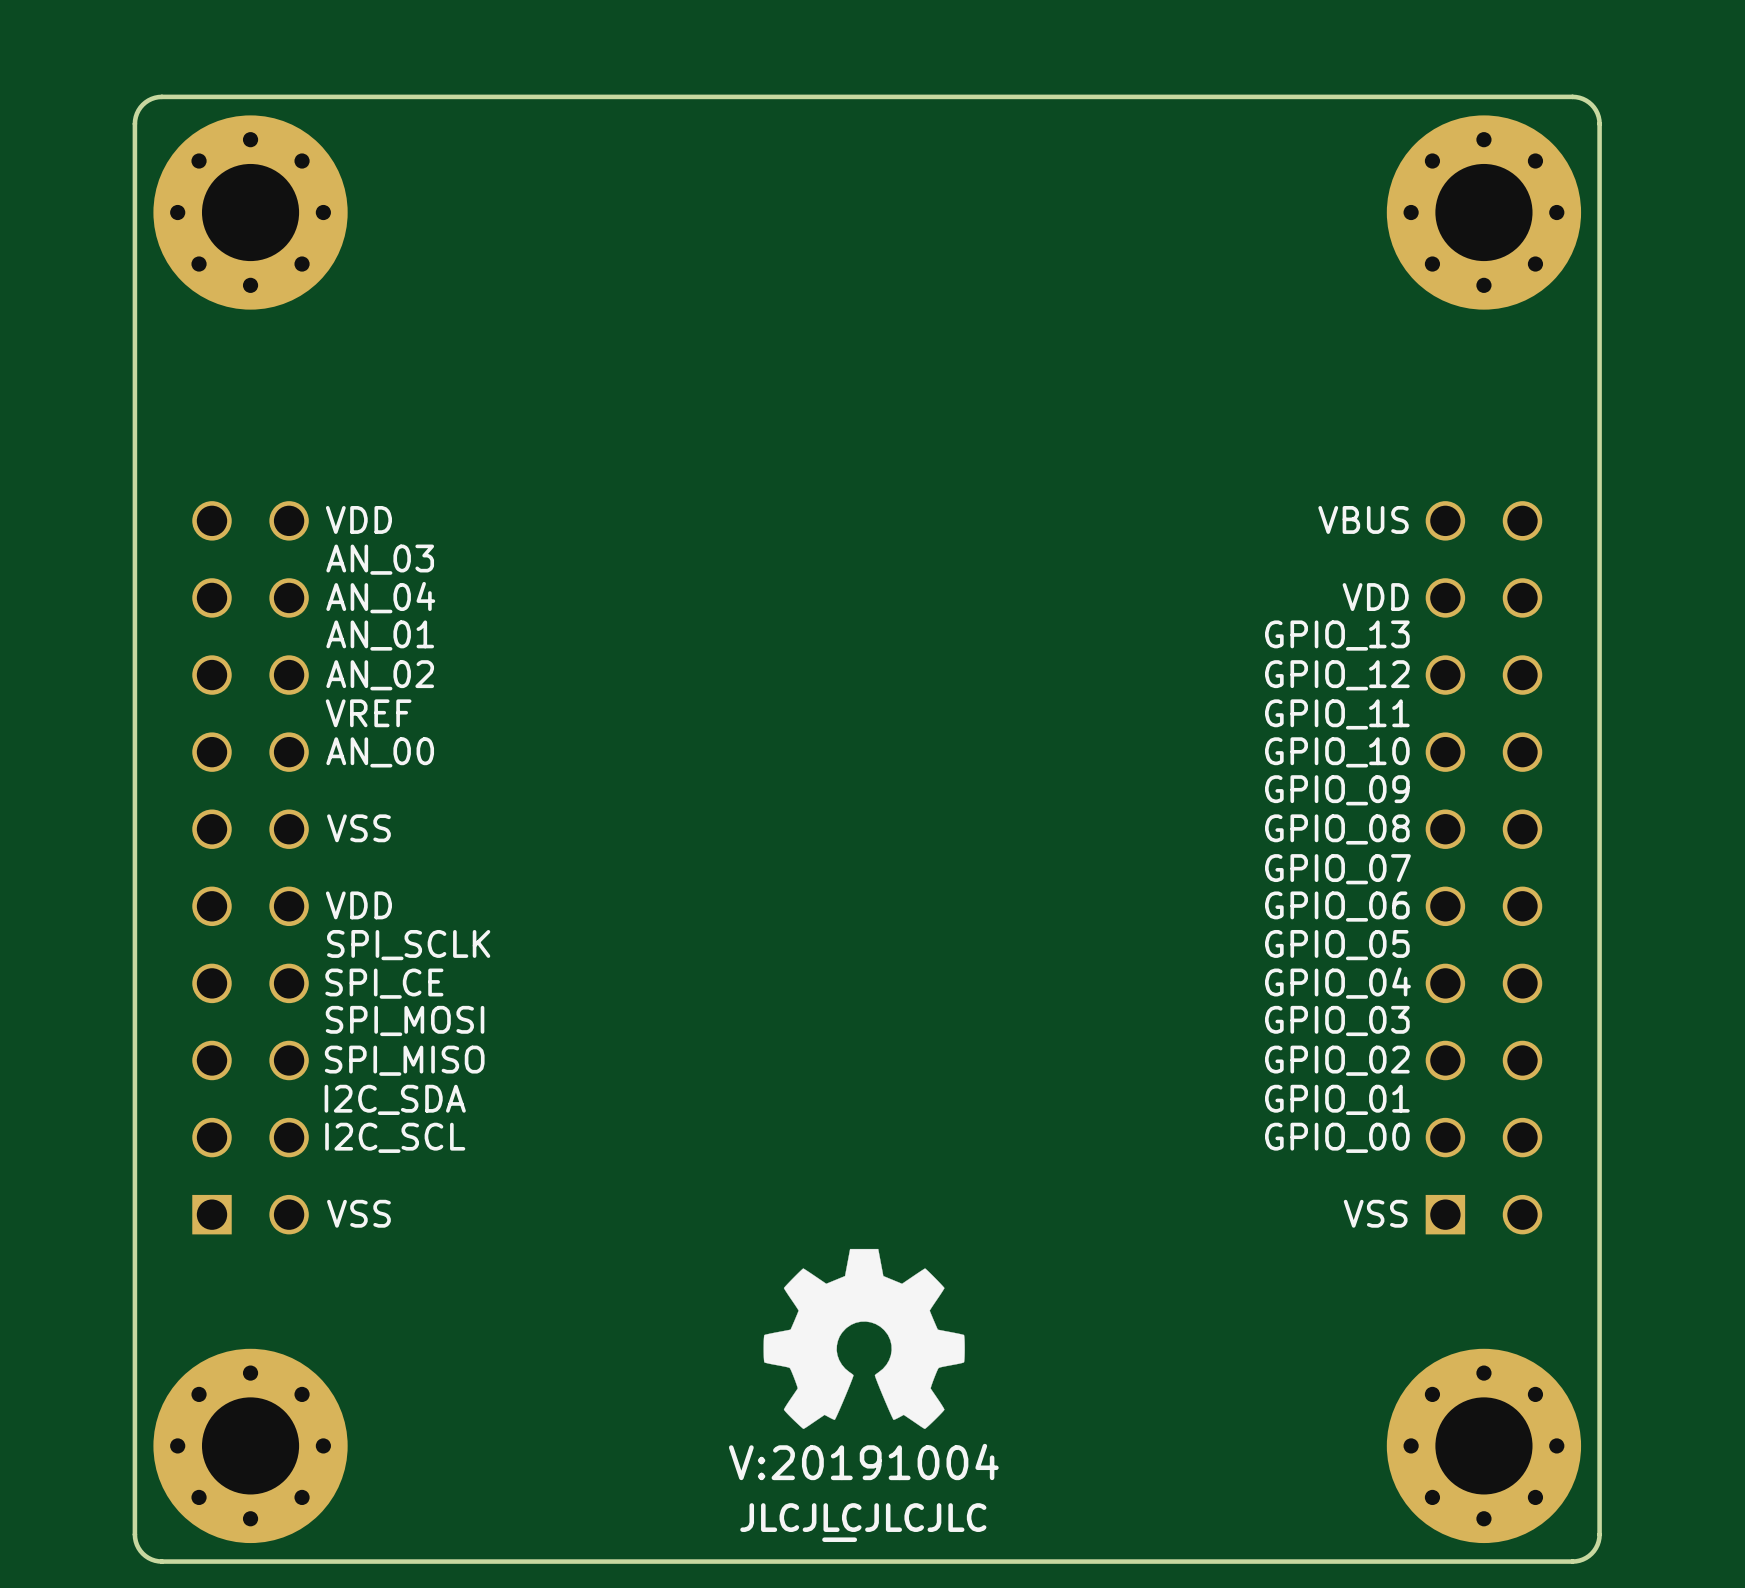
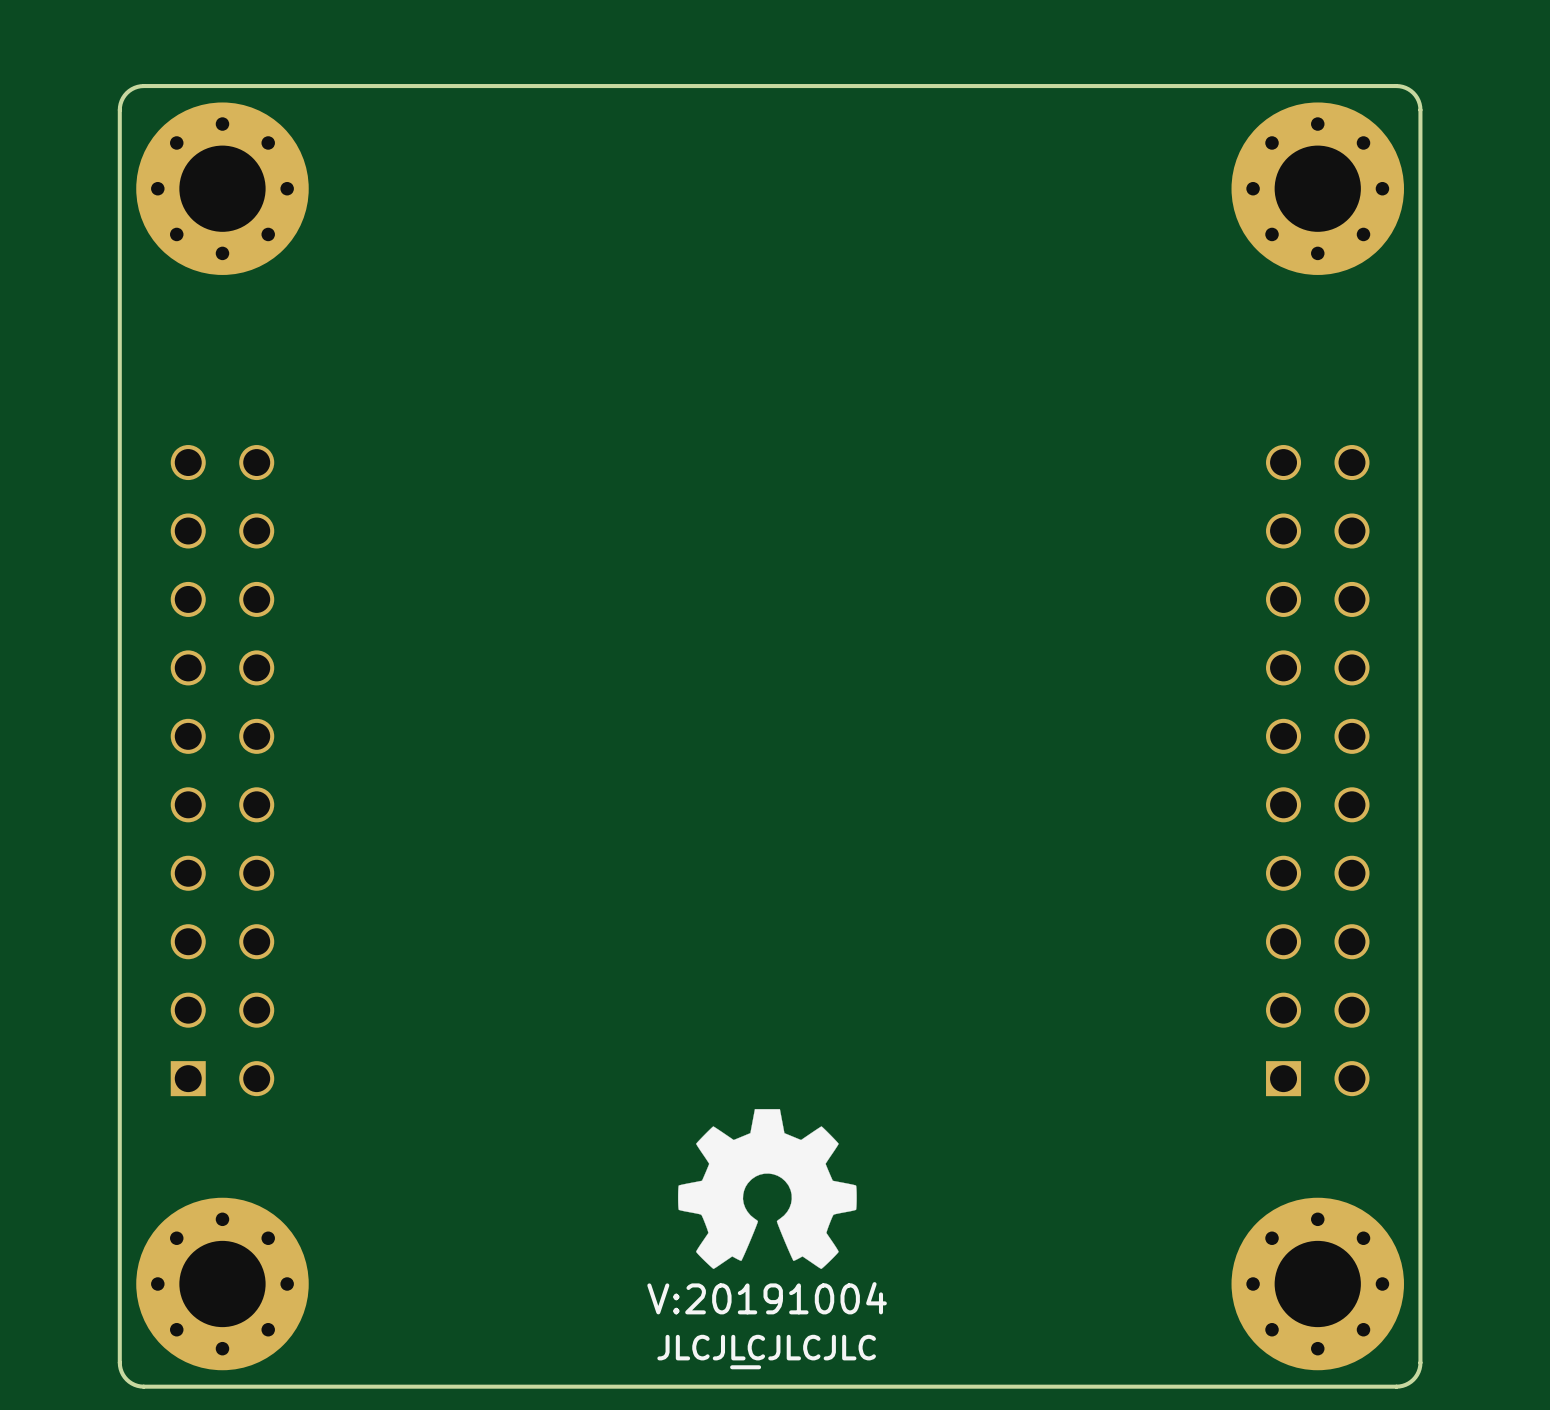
part footprint: [192, 501, 309, 1235] -> [170, 445, 275, 1097]
part footprint: [1425, 501, 1543, 1235] -> [1266, 445, 1370, 1097]

